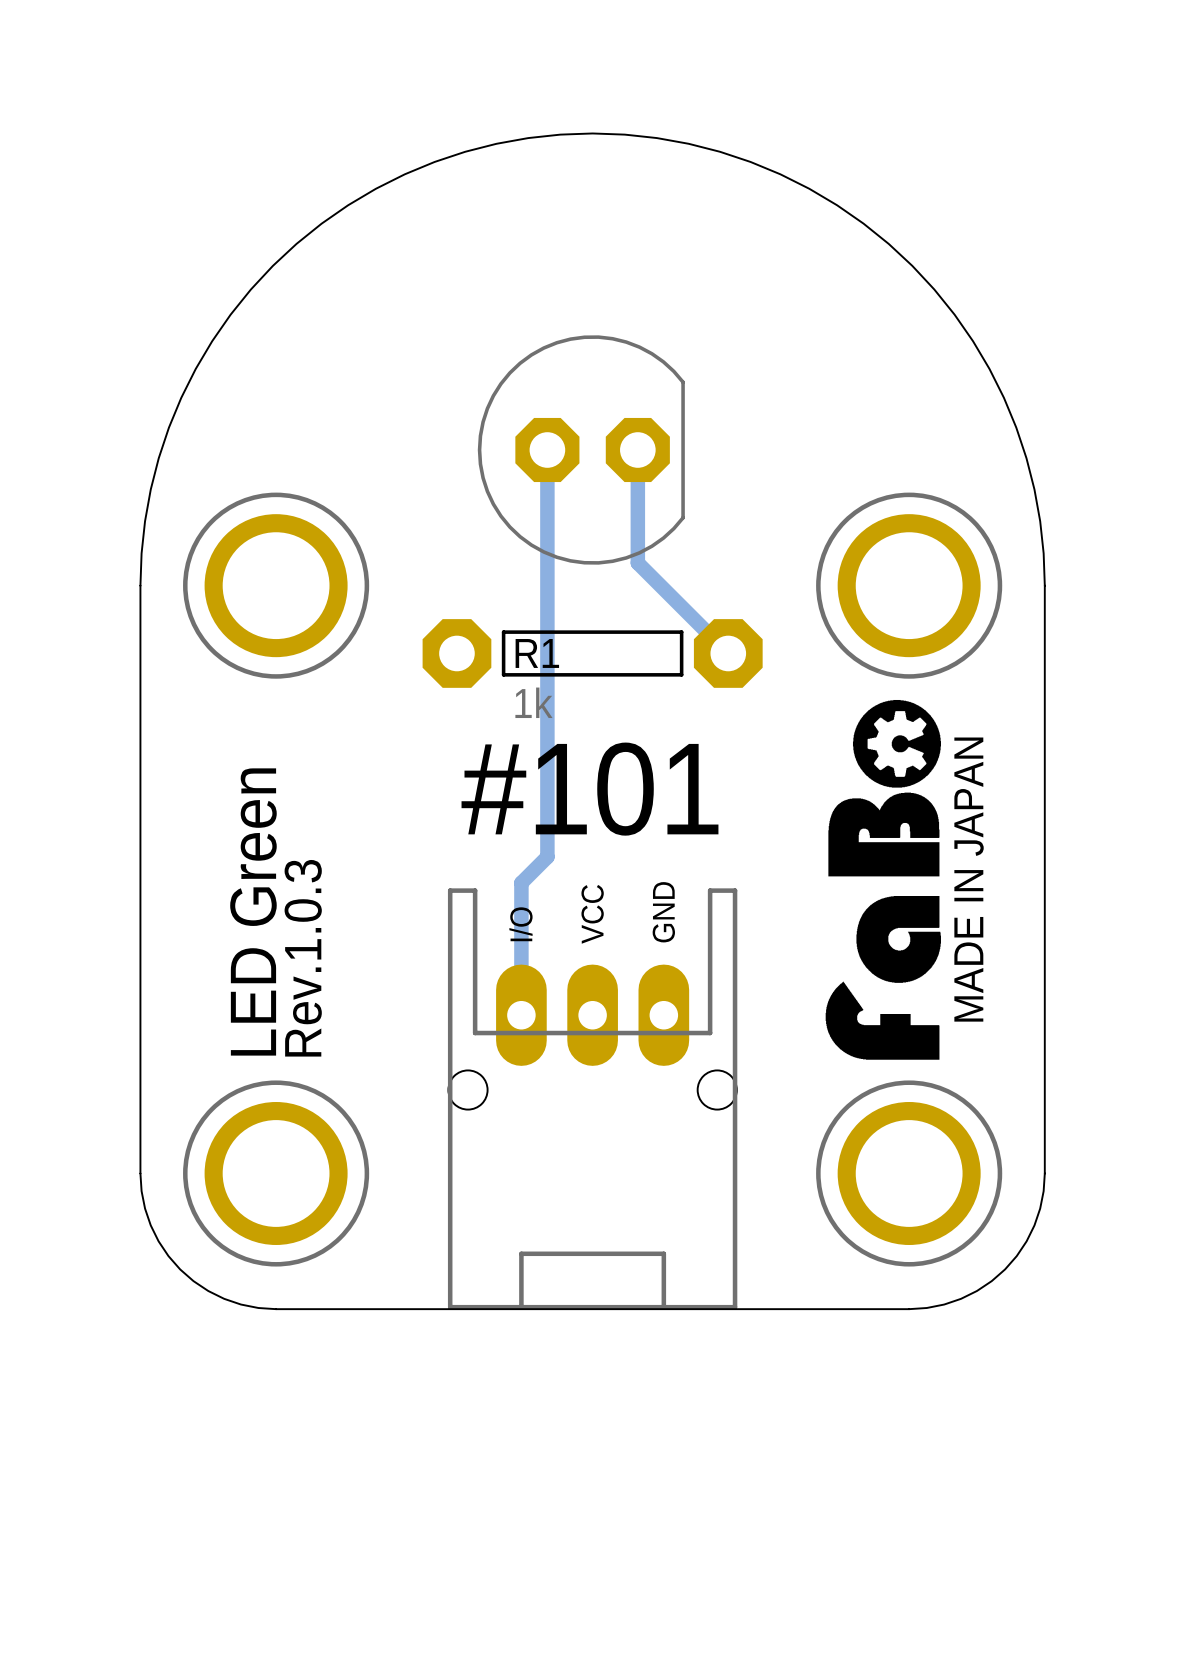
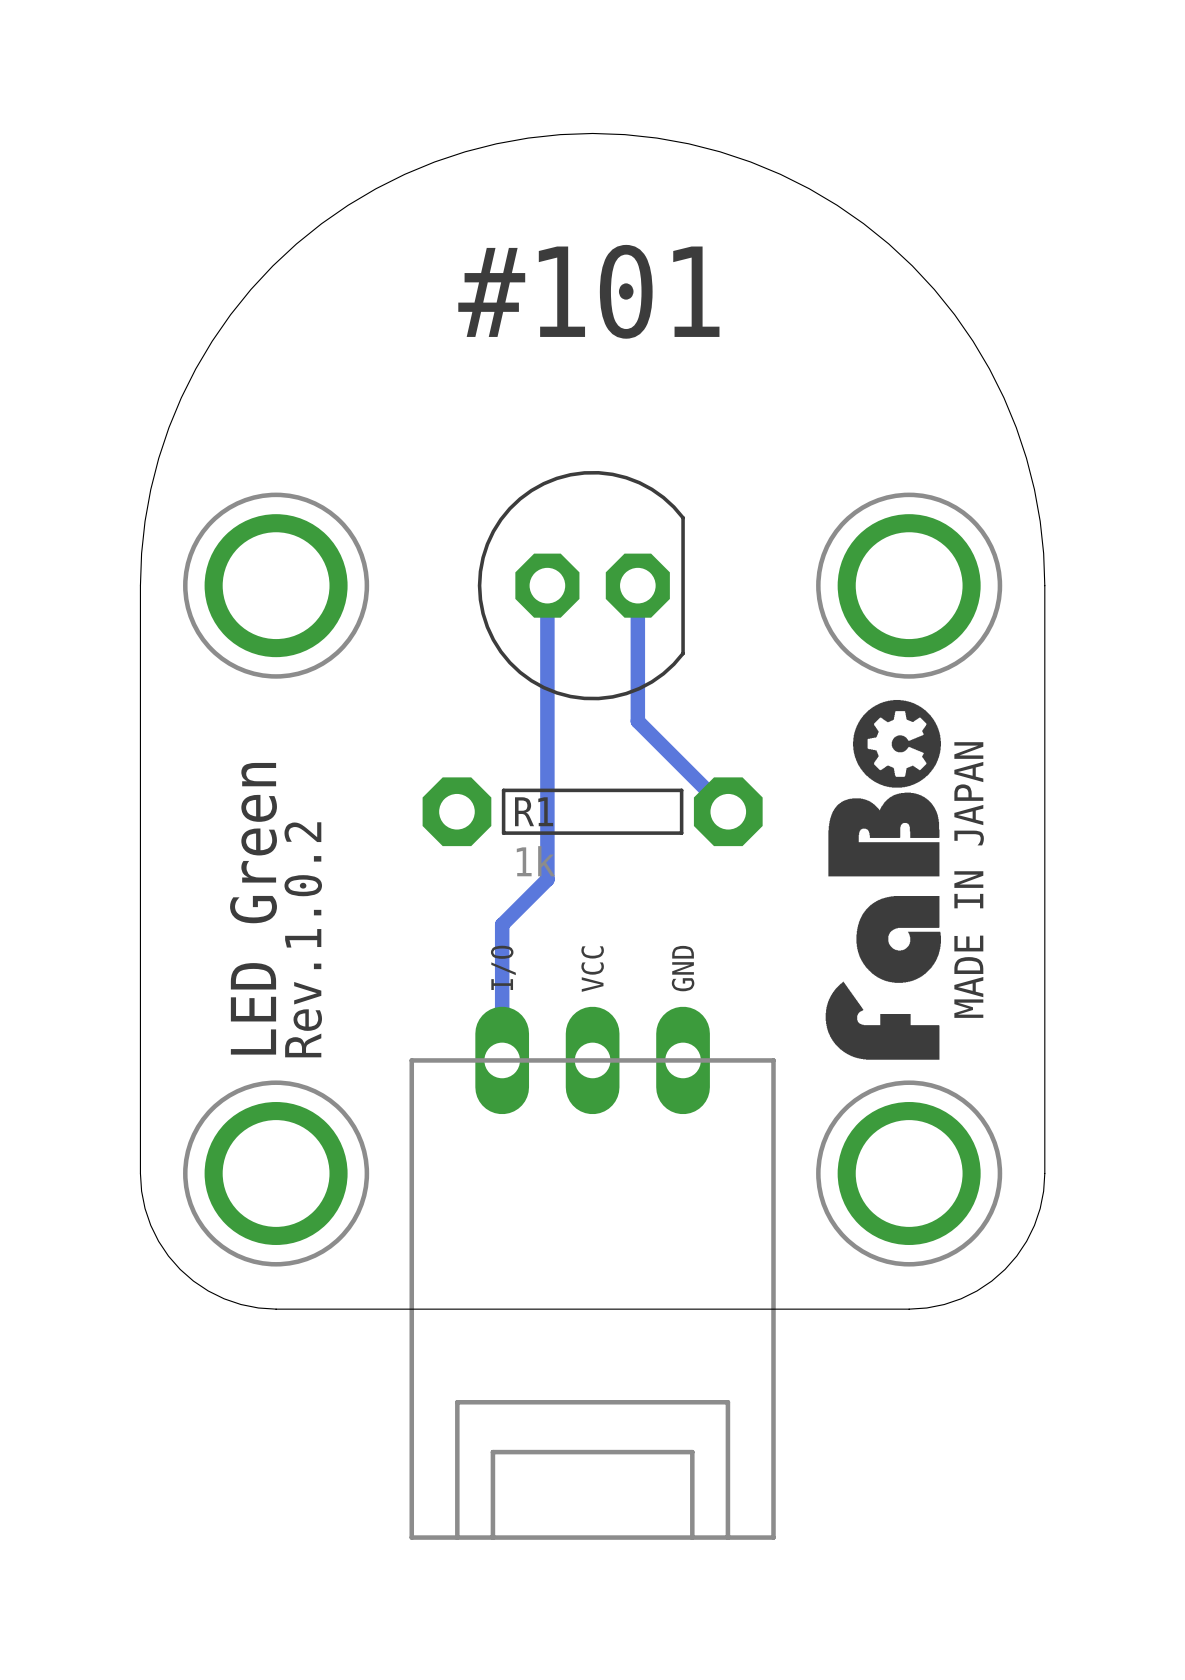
bottom track: (547, 450) (547, 585) -> none
part: (581, 450) -> none
bottom track: (637, 450) (637, 563) (728, 653) -> none
part: none -> (581, 585)
bottom track: none -> (637, 585) (637, 721) (728, 811)
R1 position: (592, 653) -> (592, 811)
part: (592, 721) -> none
text position: #101 (589, 789) -> #101 (588, 291)
part: none -> (592, 836)
bottom track: (547, 856) (521, 882) (521, 1015) -> (547, 856) (547, 879) (502, 924) (502, 1060)
text: Rev.1.0.3 (303, 958) -> Rev.1.0.2 (303, 939)

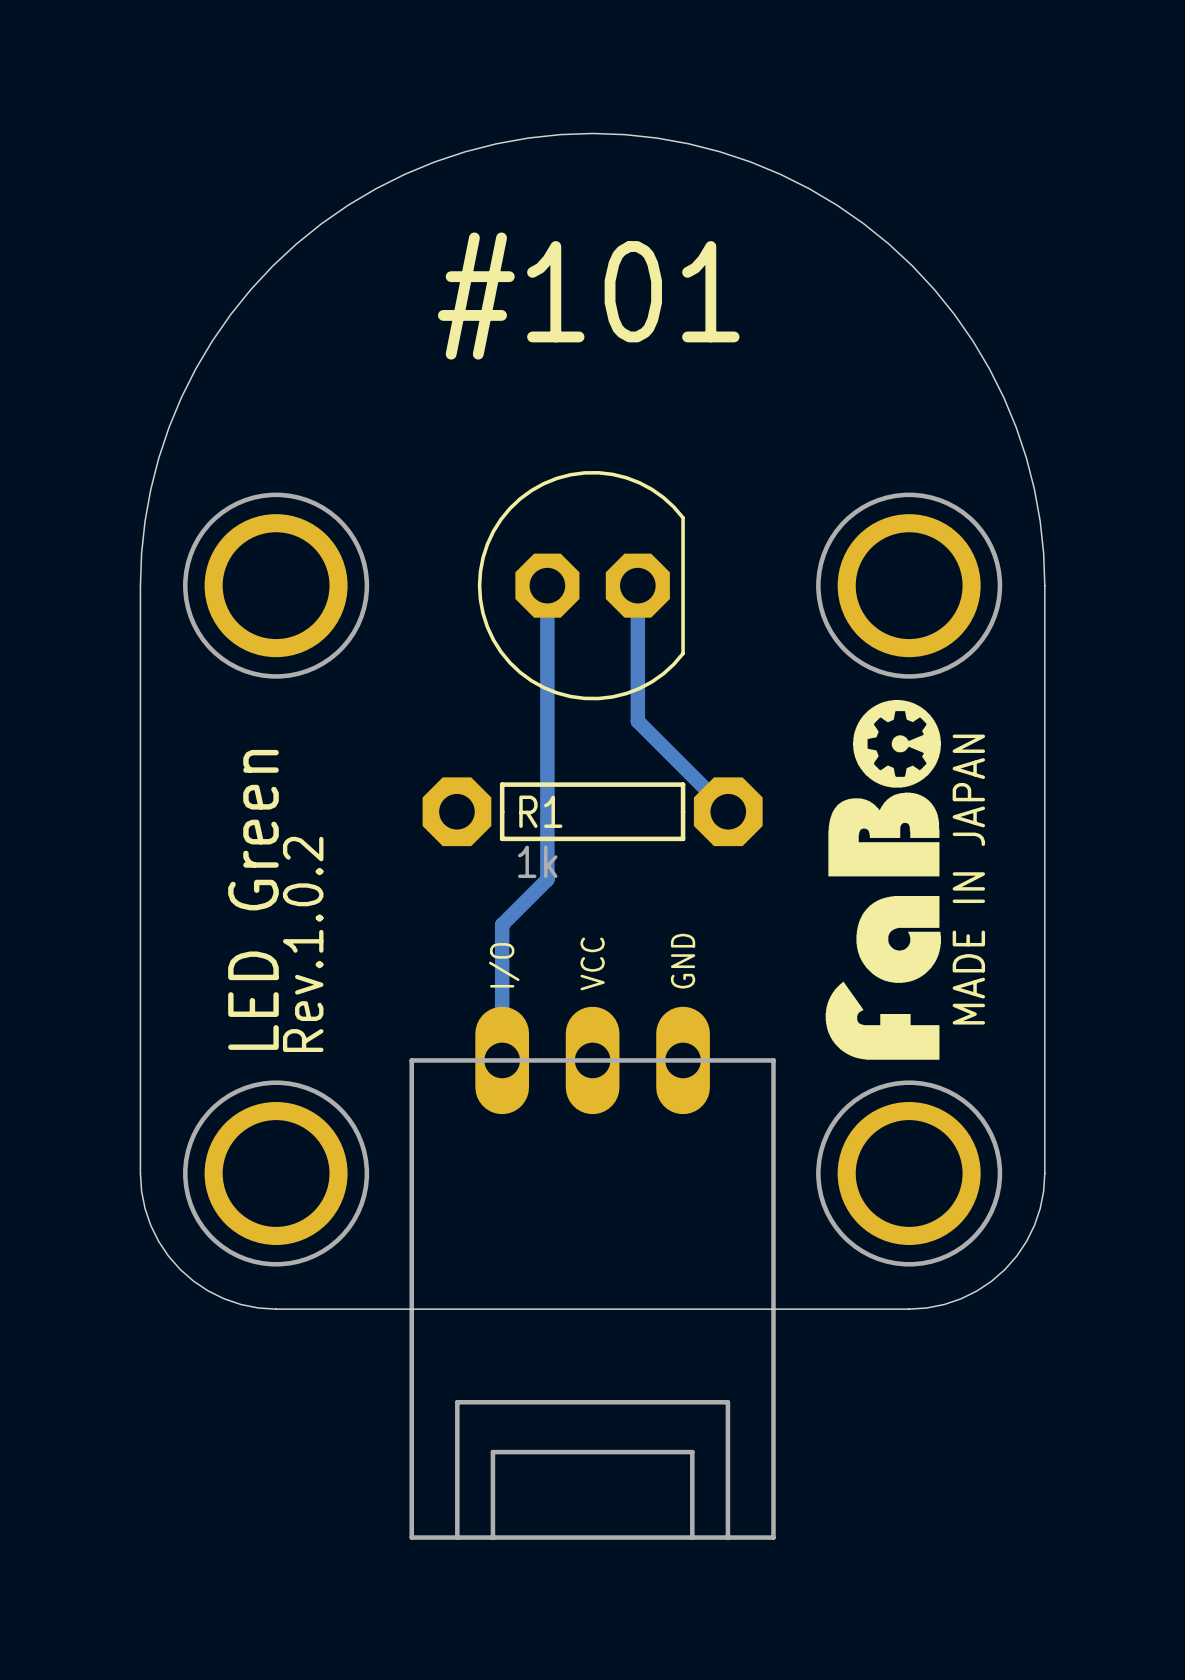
R1 footprint: [422, 777, 763, 847] -> [422, 777, 763, 847]

